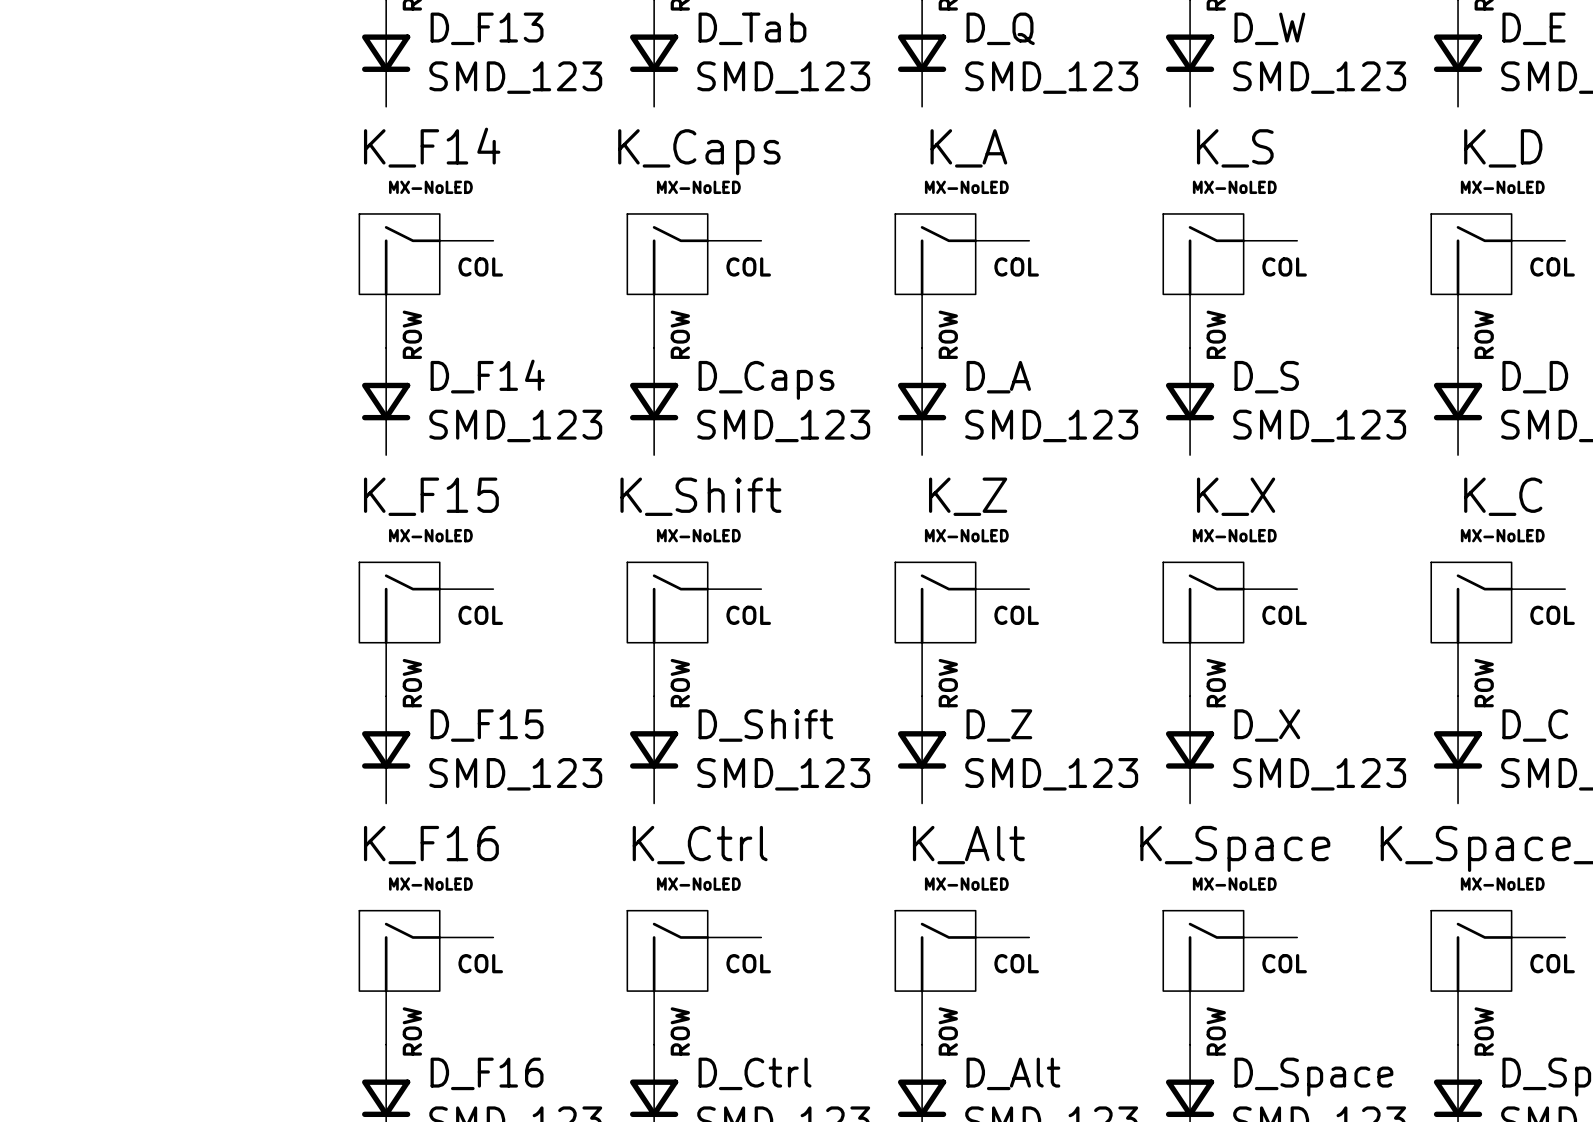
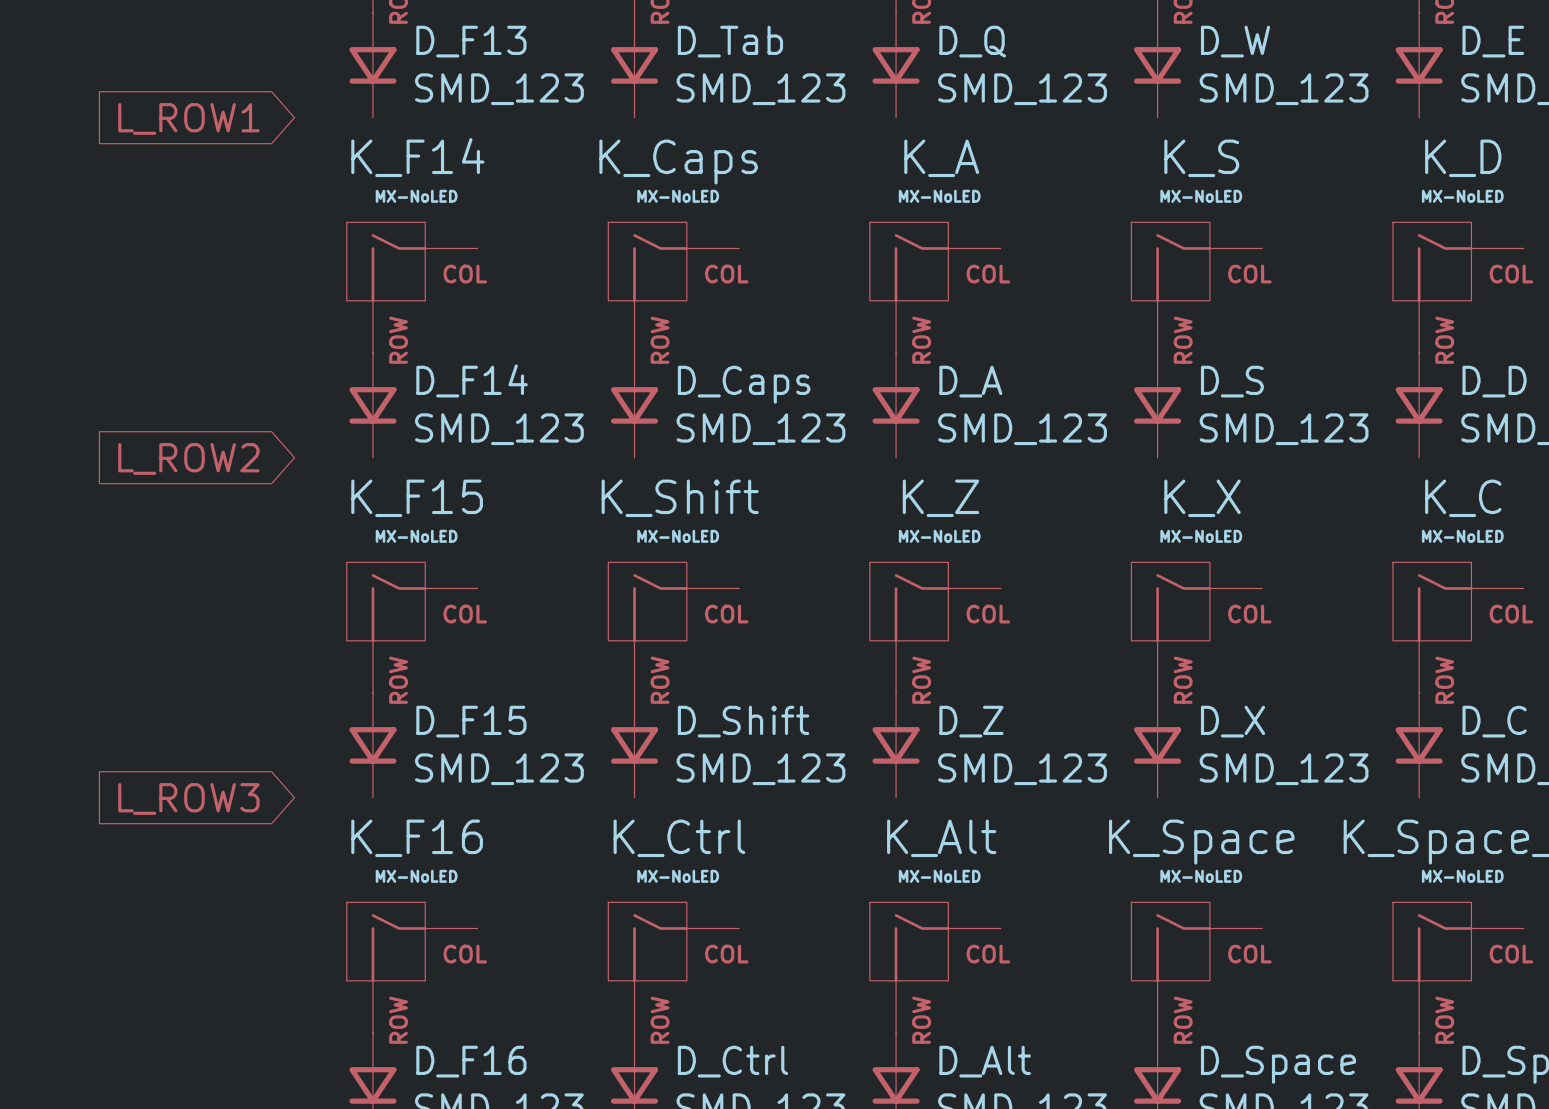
global label: none -> L_ROW1 (188, 118)
global label: none -> L_ROW2 (188, 458)
global label: none -> L_ROW3 (188, 798)

